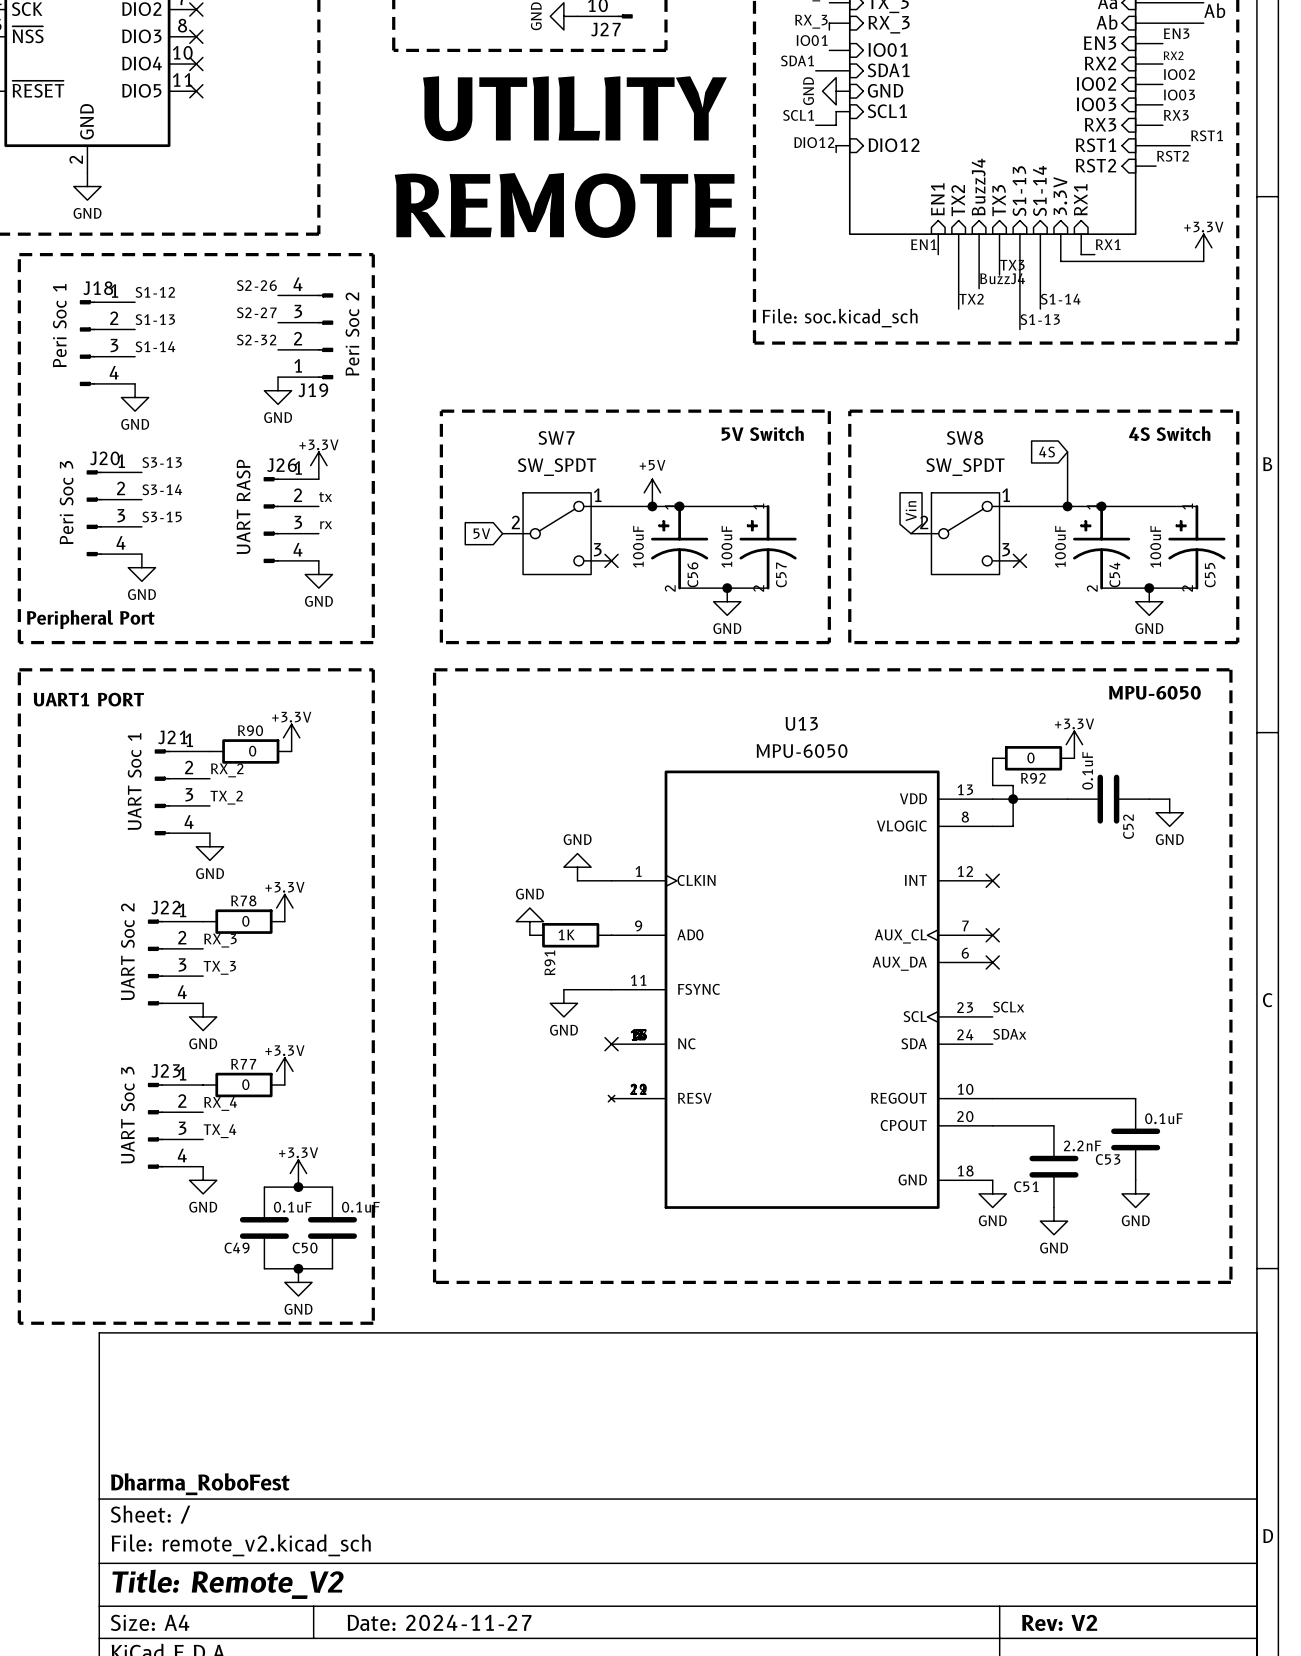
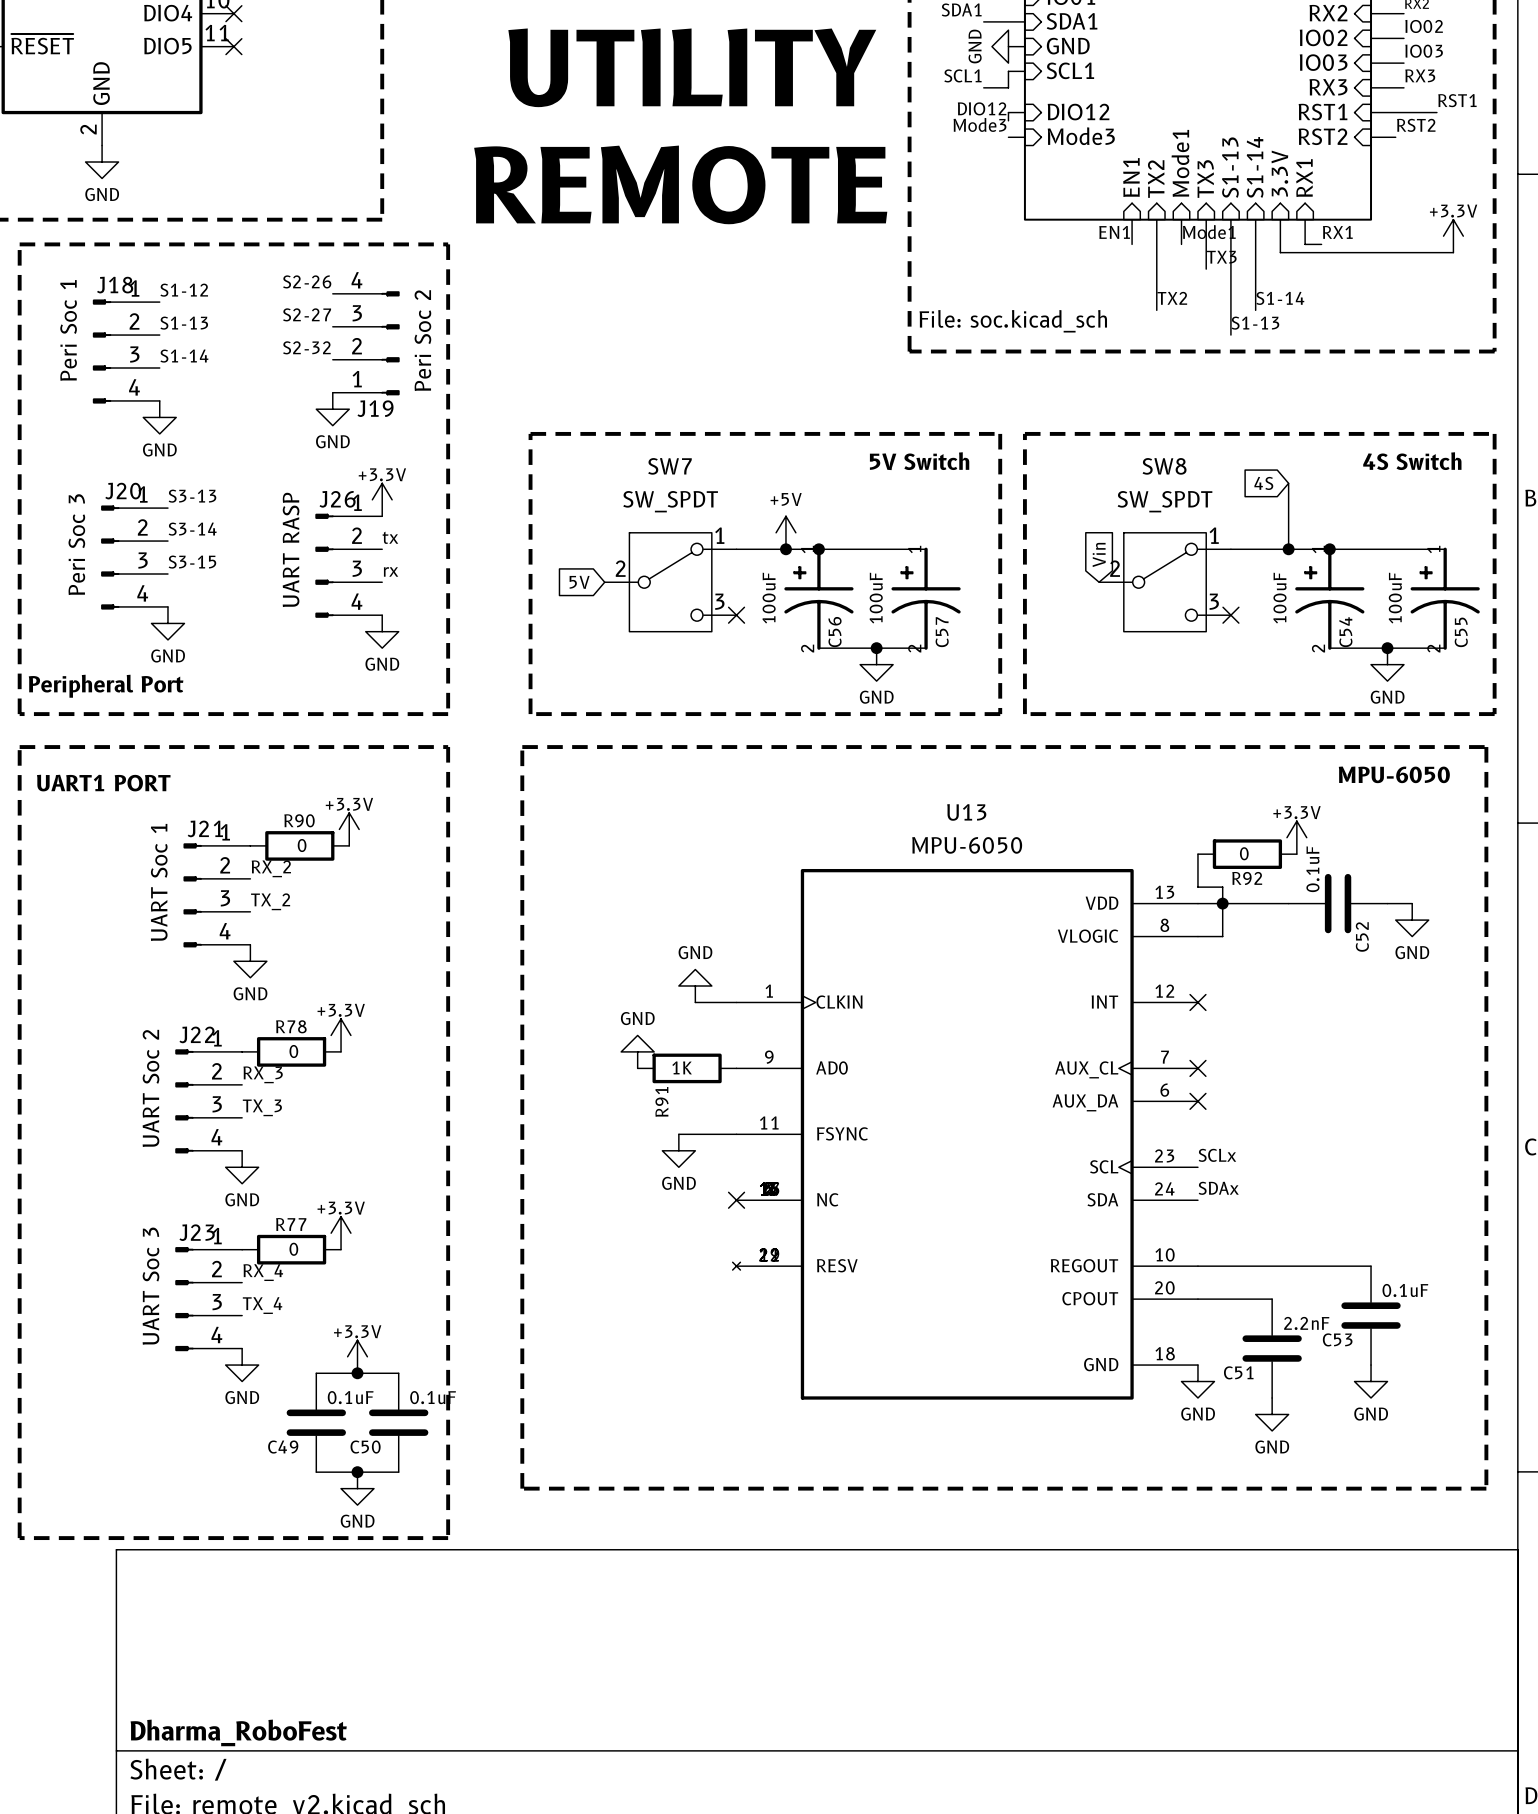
label: none -> Mode3 (979, 124)
sheet pin: none -> Mode3 (1081, 136)
wire: none -> (1008, 137) (1024, 137)
sheet pin: BuzzJ4 (978, 187) -> Mode1 (1180, 163)
label: none -> Mode1 (1209, 232)
wire: (979, 254) (979, 288) -> none
label: BuzzJ4 (1002, 278) -> none

